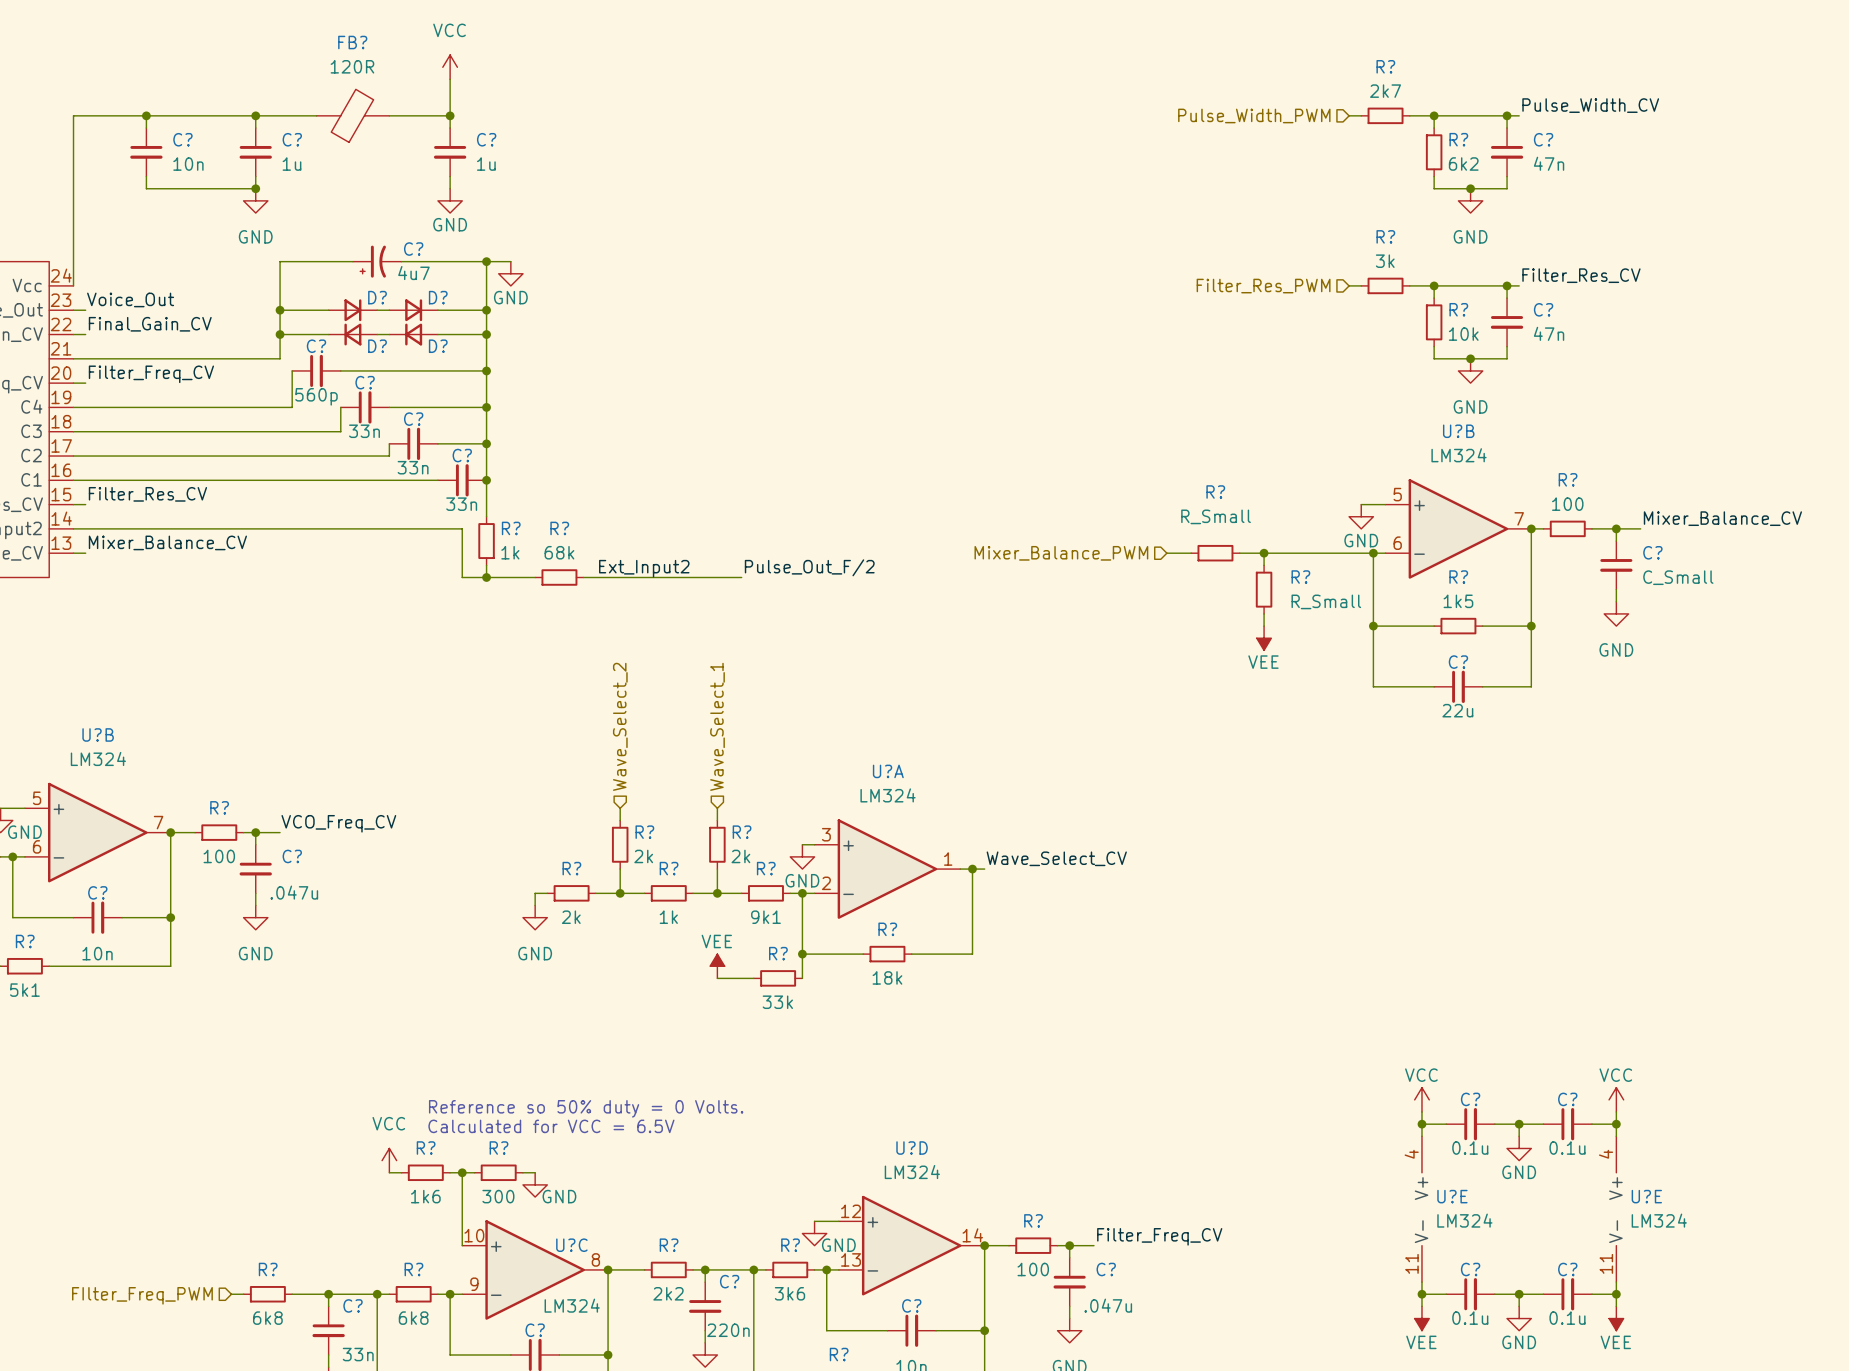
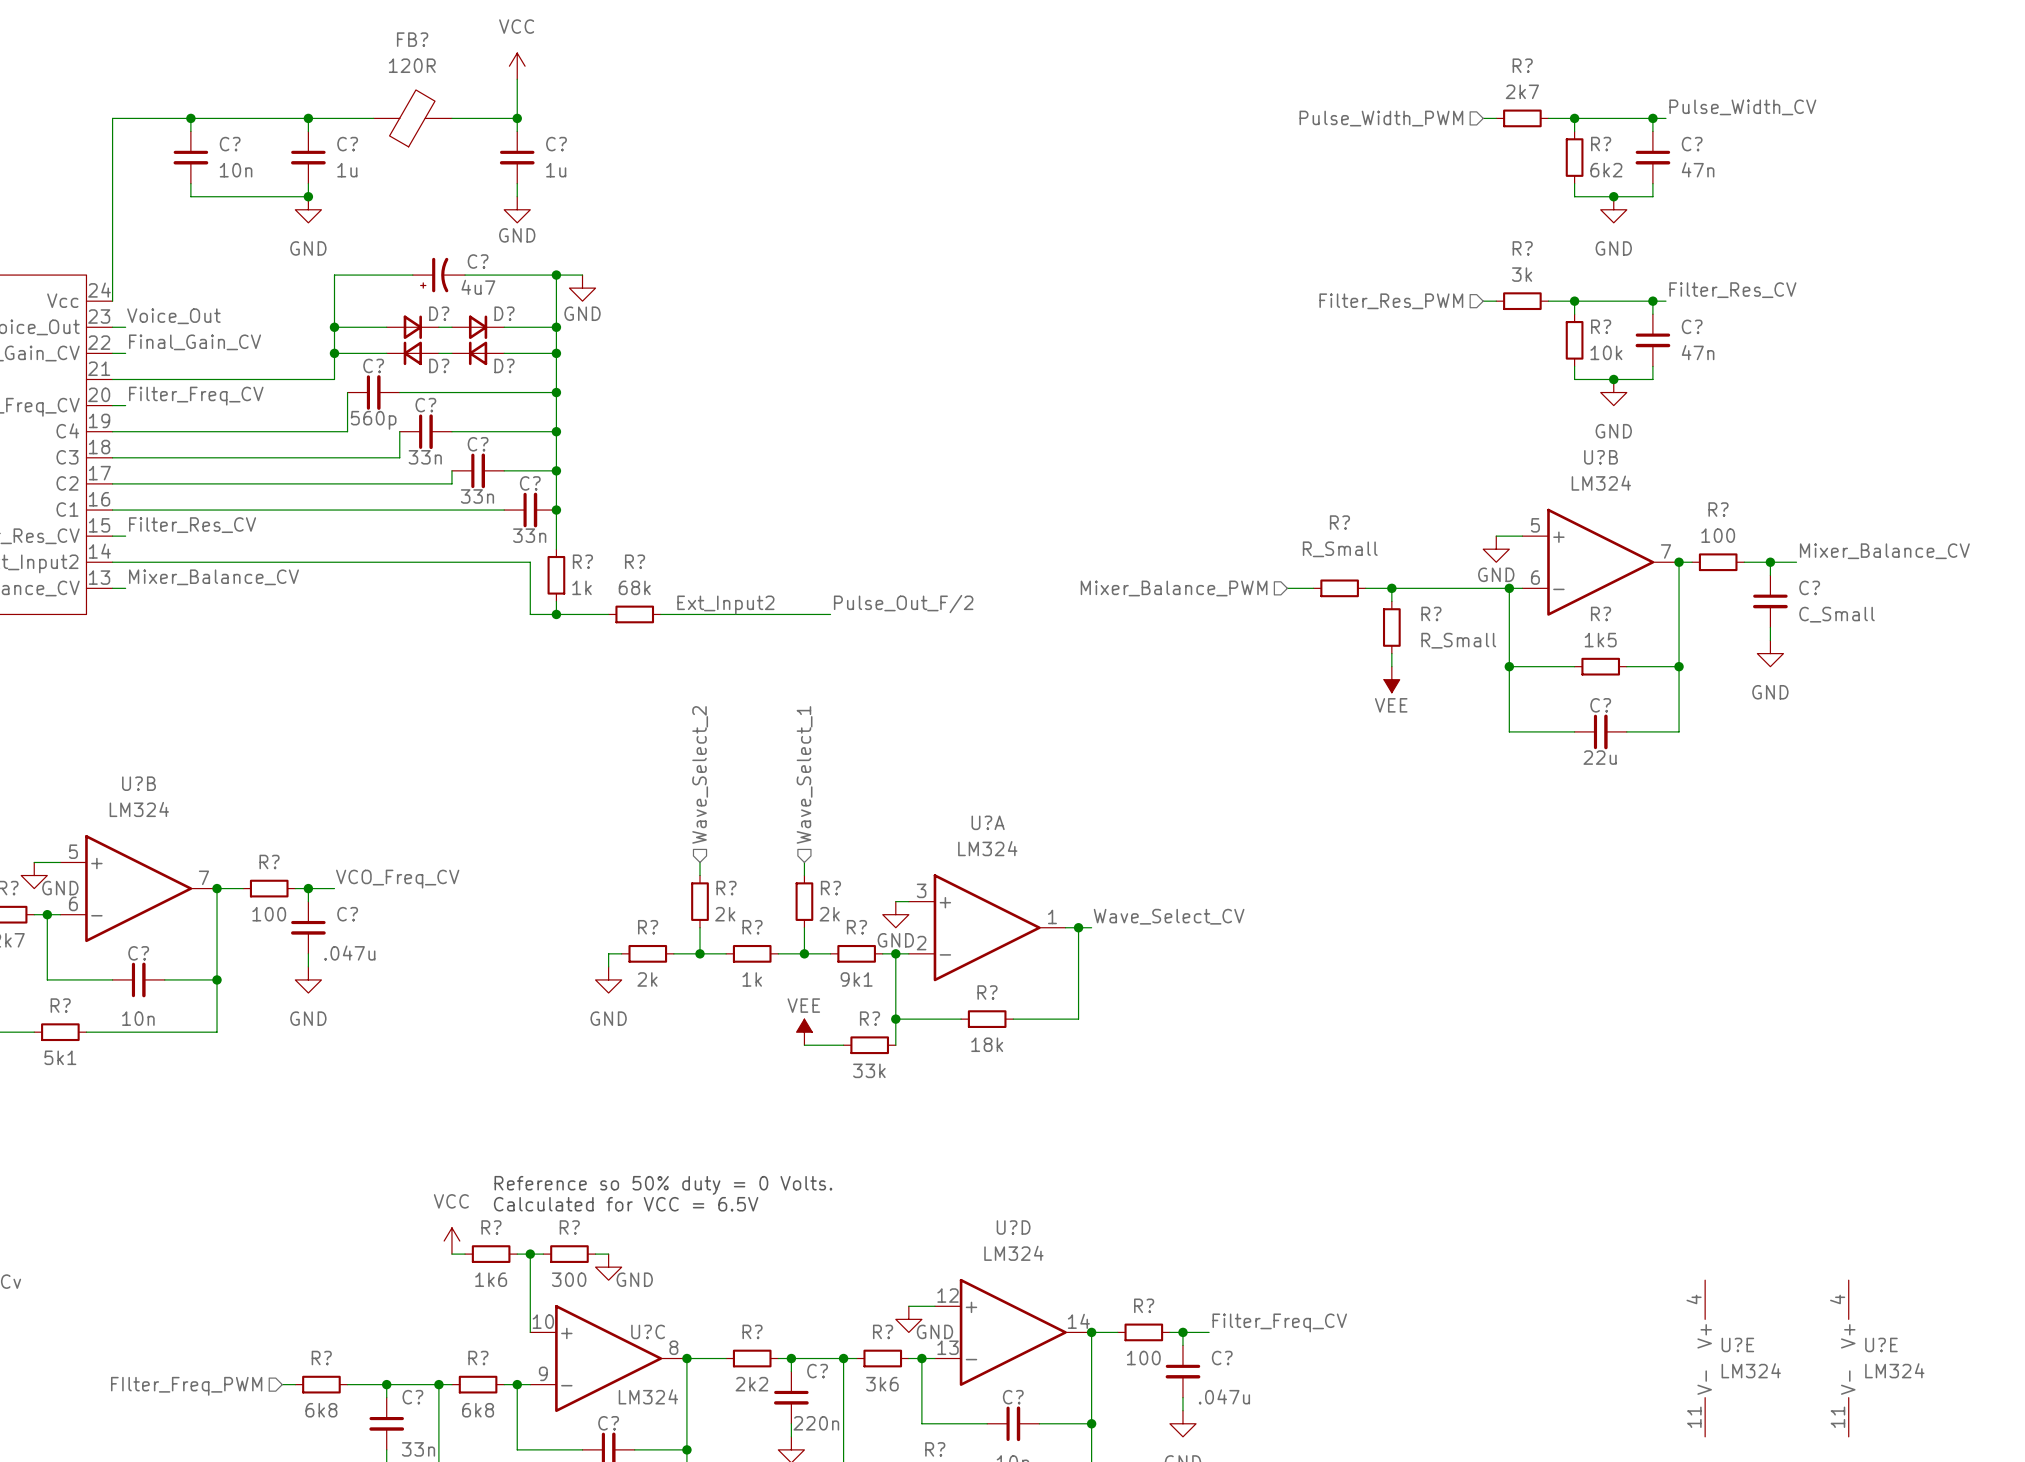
power symbol: VCC (1421, 1099) -> none
power symbol: VCC (1616, 1099) -> none
wire: (1421, 1112) (1421, 1136) -> none
wire: (1616, 1112) (1616, 1136) -> none
wire: (1421, 1124) (1446, 1124) -> none
junction: (1421, 1124) -> none
C?: 0.1u (1470, 1124) -> none
wire: (1494, 1124) (1543, 1124) -> none
wire: (1519, 1124) (1519, 1136) -> none
junction: (1519, 1124) -> none
C?: 0.1u (1567, 1124) -> none
wire: (1592, 1124) (1616, 1124) -> none
junction: (1616, 1124) -> none
power symbol: GND (1519, 1148) -> none
U?E: LM324 (1421, 1209) -> none
U?E: LM324 (1616, 1209) -> none
U?E: none -> LM324 (1705, 1358)
U?E: none -> LM324 (1848, 1358)
wire: (1421, 1282) (1421, 1306) -> none
wire: (1616, 1282) (1616, 1306) -> none
wire: (1421, 1294) (1446, 1294) -> none
junction: (1421, 1294) -> none
C?: 0.1u (1470, 1294) -> none
wire: (1494, 1294) (1543, 1294) -> none
wire: (1519, 1294) (1519, 1306) -> none
junction: (1519, 1294) -> none
C?: 0.1u (1567, 1294) -> none
wire: (1592, 1294) (1616, 1294) -> none
junction: (1616, 1294) -> none
power symbol: VEE (1421, 1318) -> none
power symbol: GND (1519, 1318) -> none
power symbol: VEE (1616, 1318) -> none

